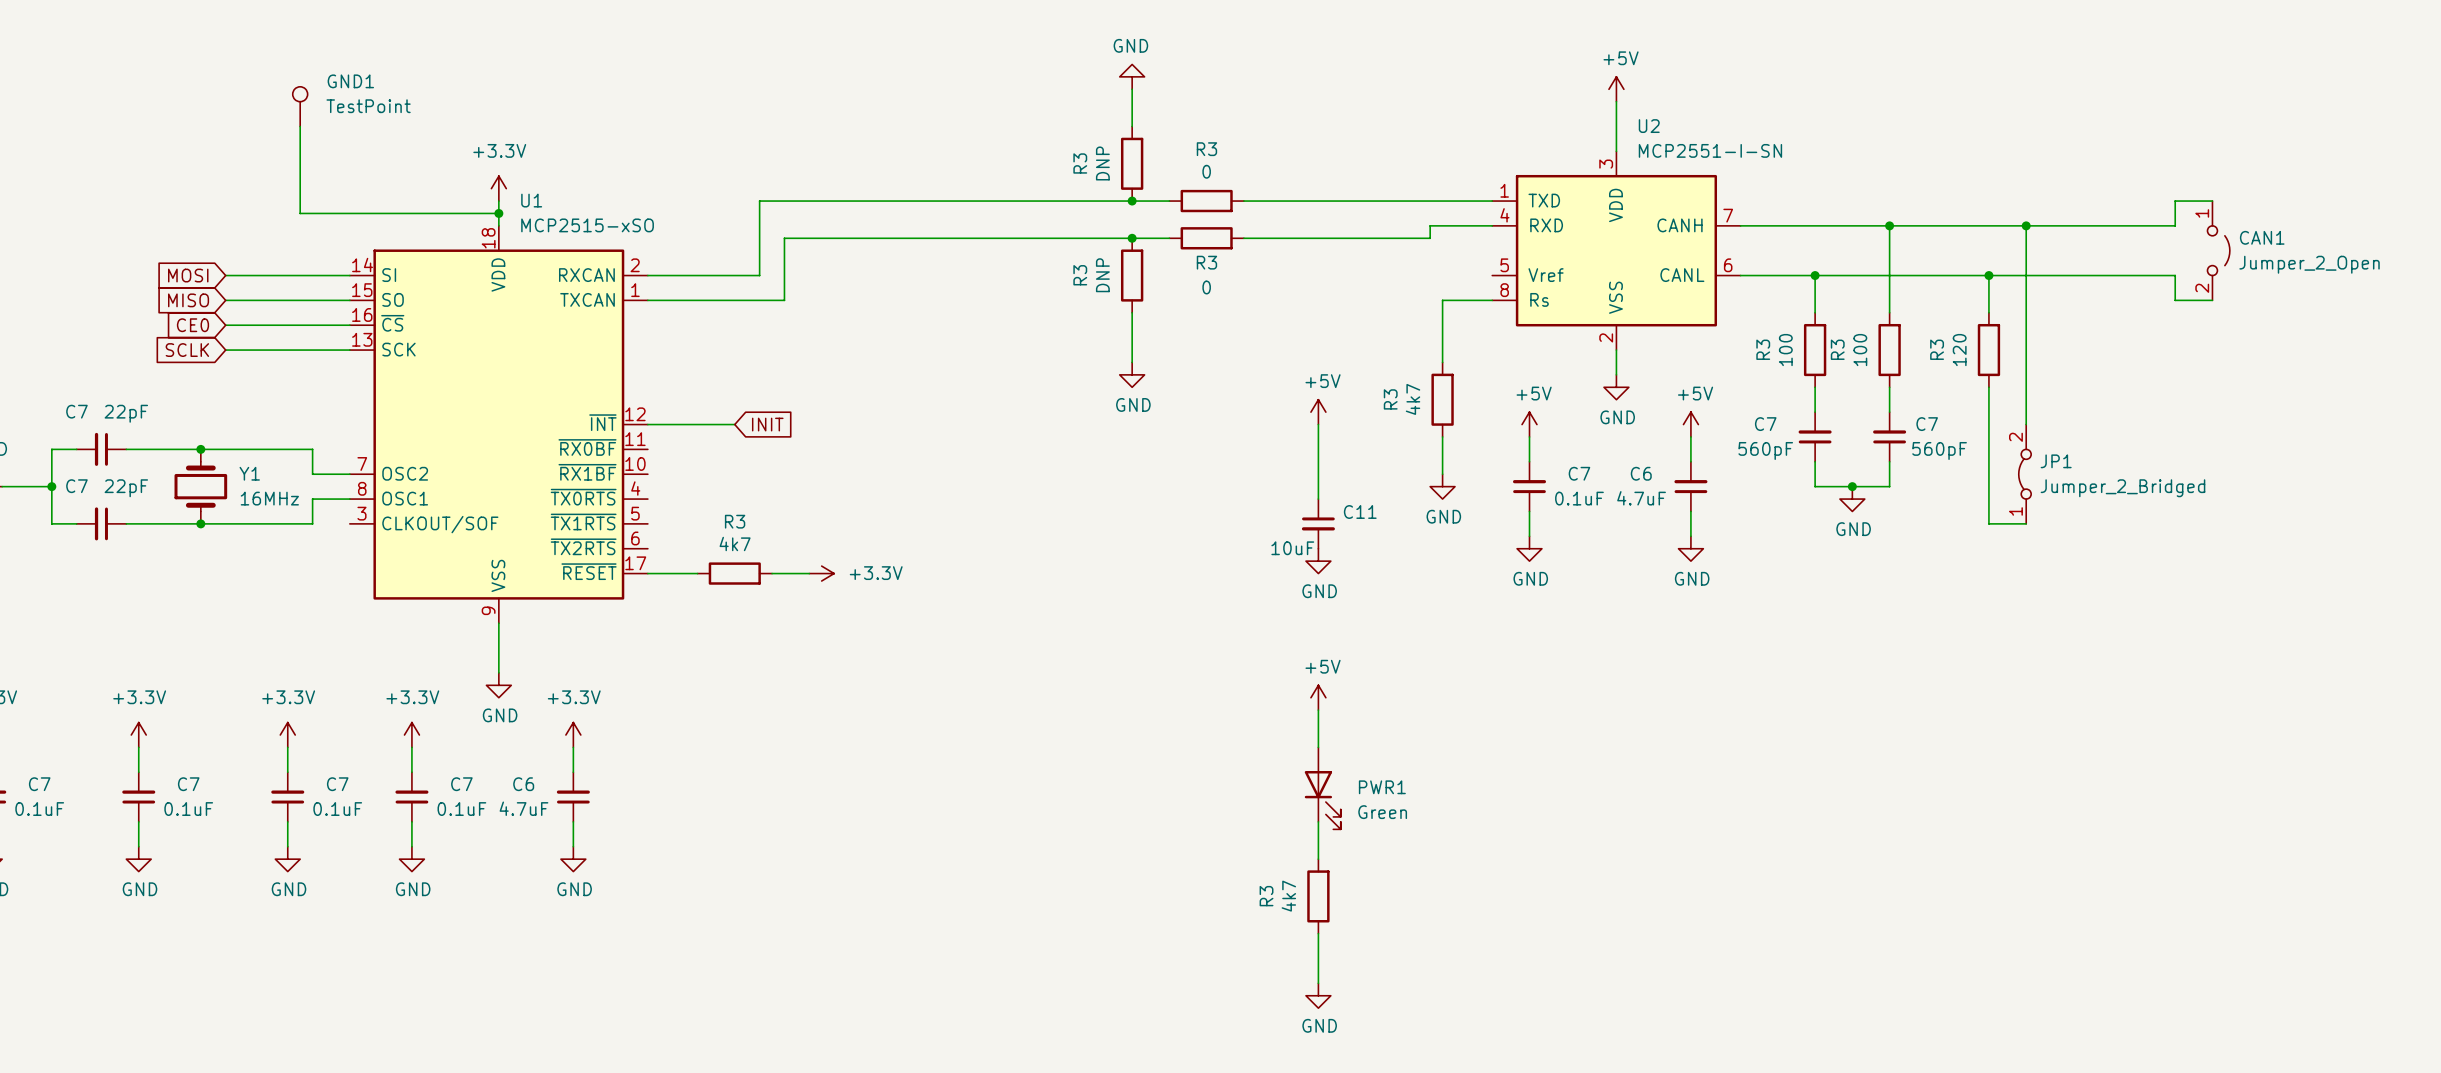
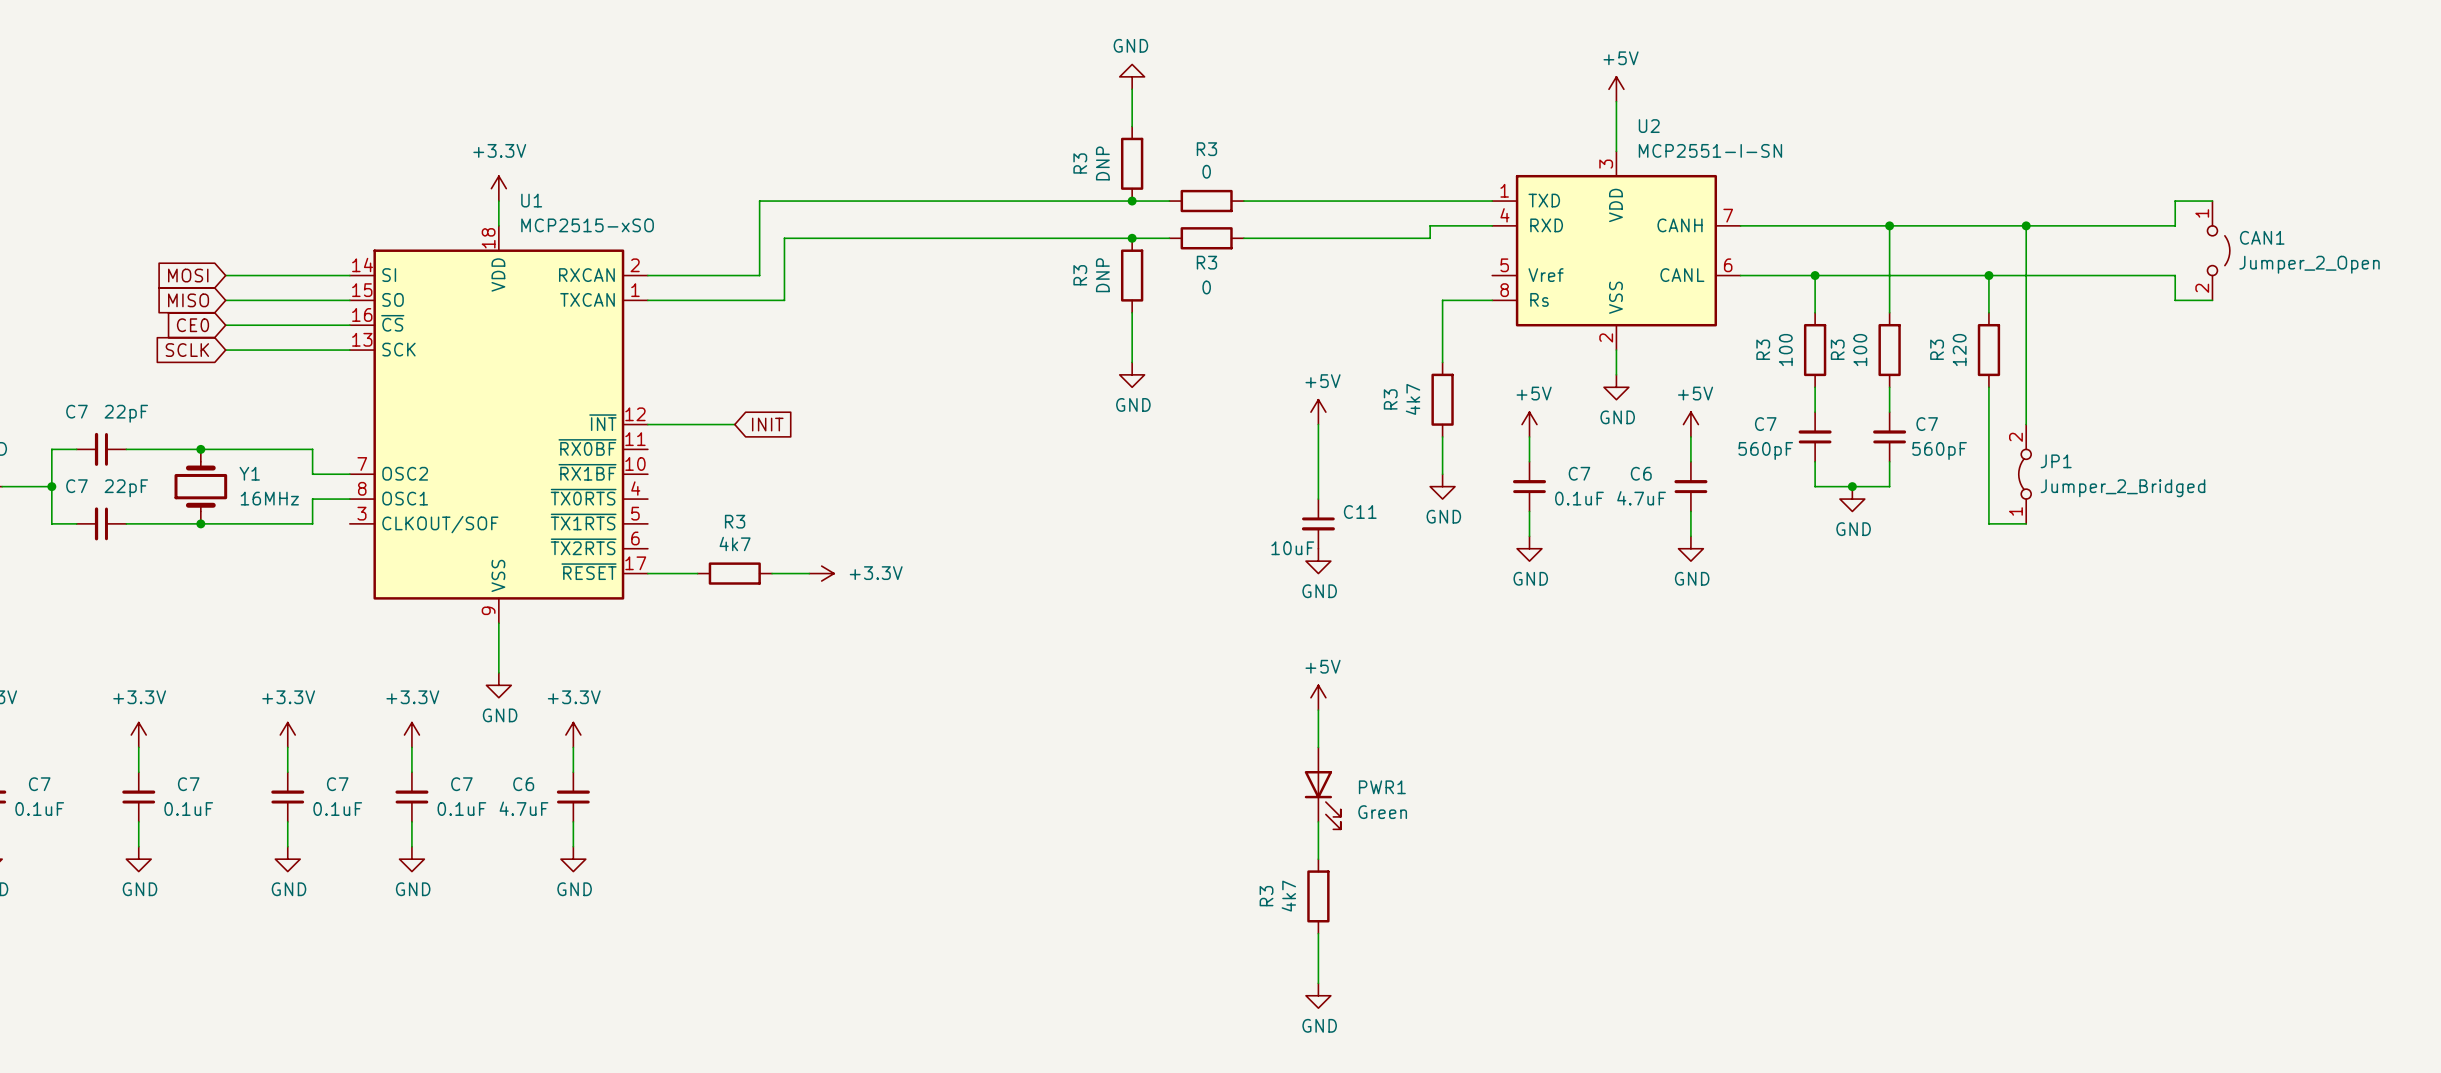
GND1: TestPoint (300, 106) -> none
wire: (300, 126) (300, 213) (498, 213) -> none
junction: (498, 213) -> none

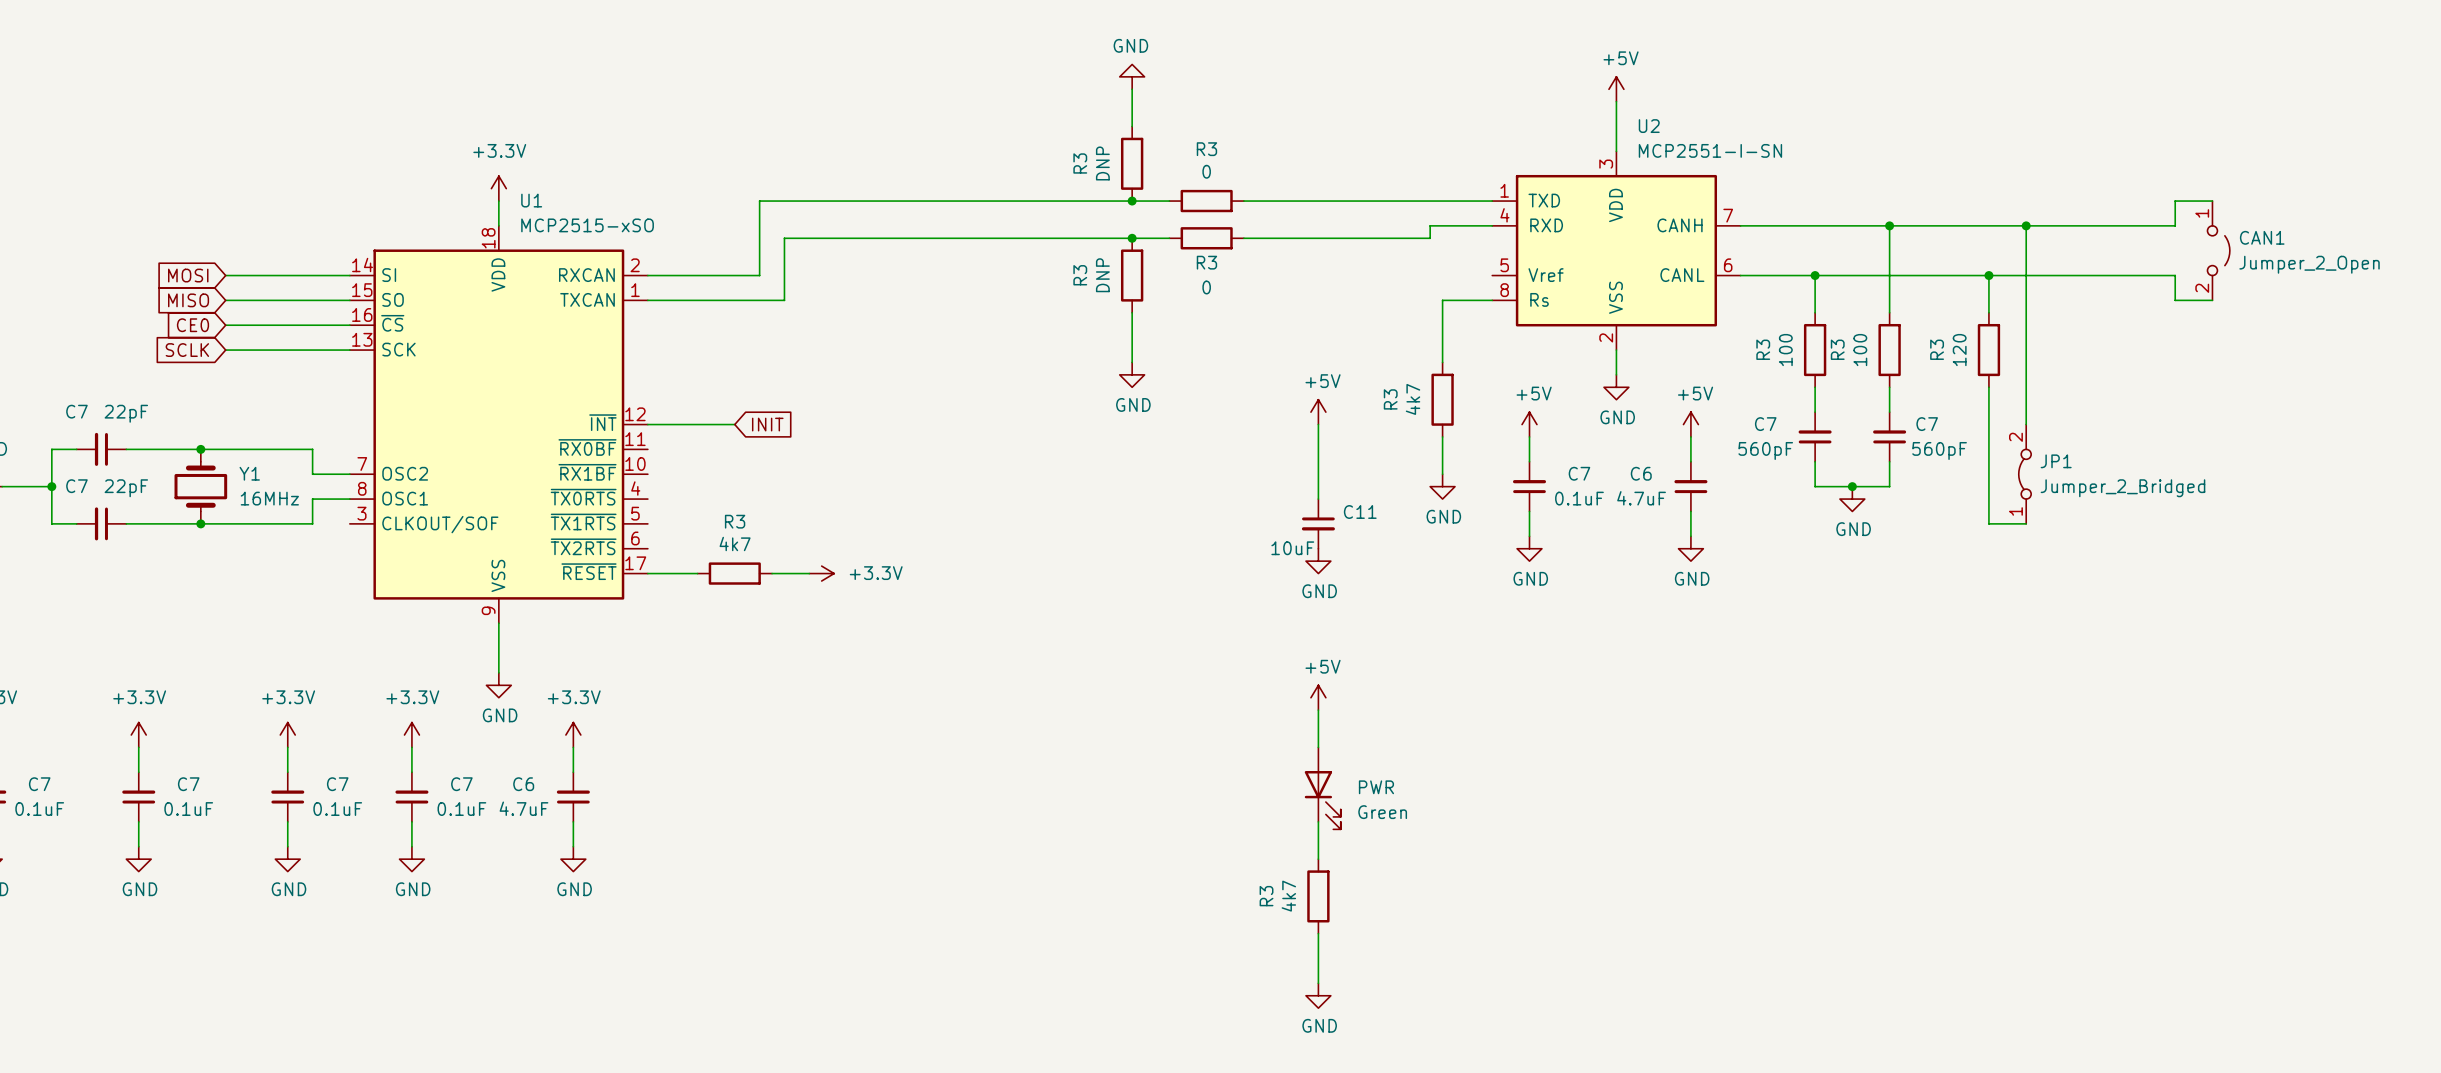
PWR1 name: PWR1 (1382, 787) -> PWR (1376, 787)

